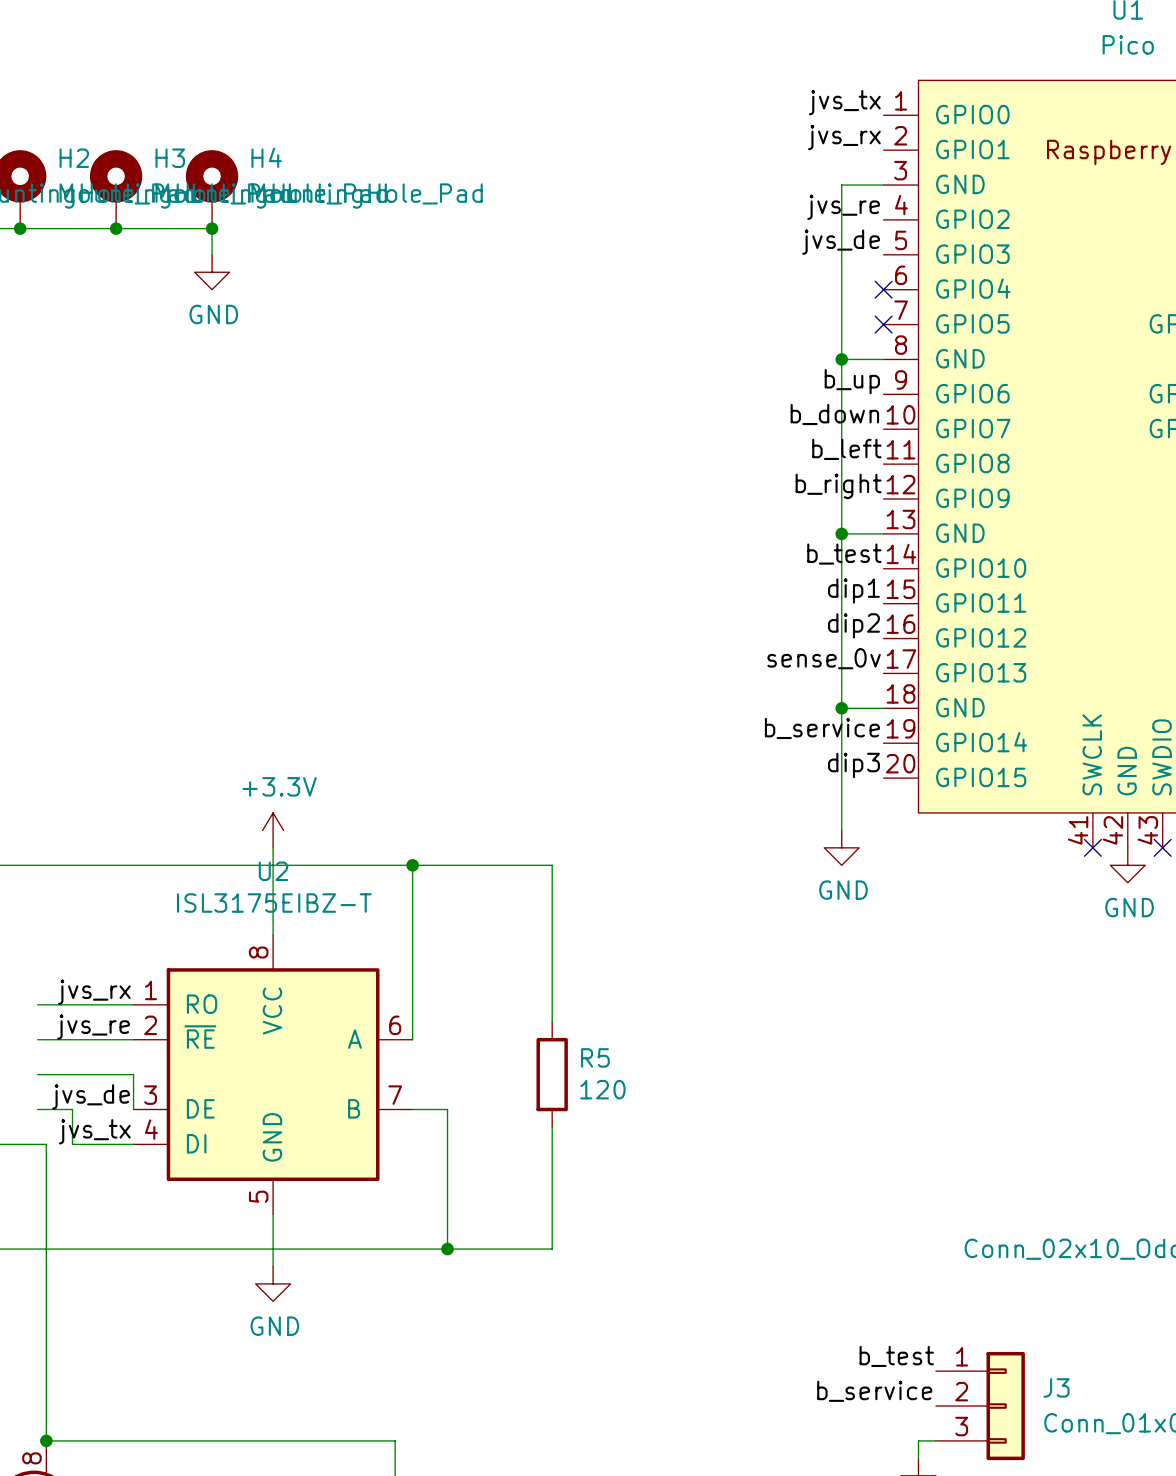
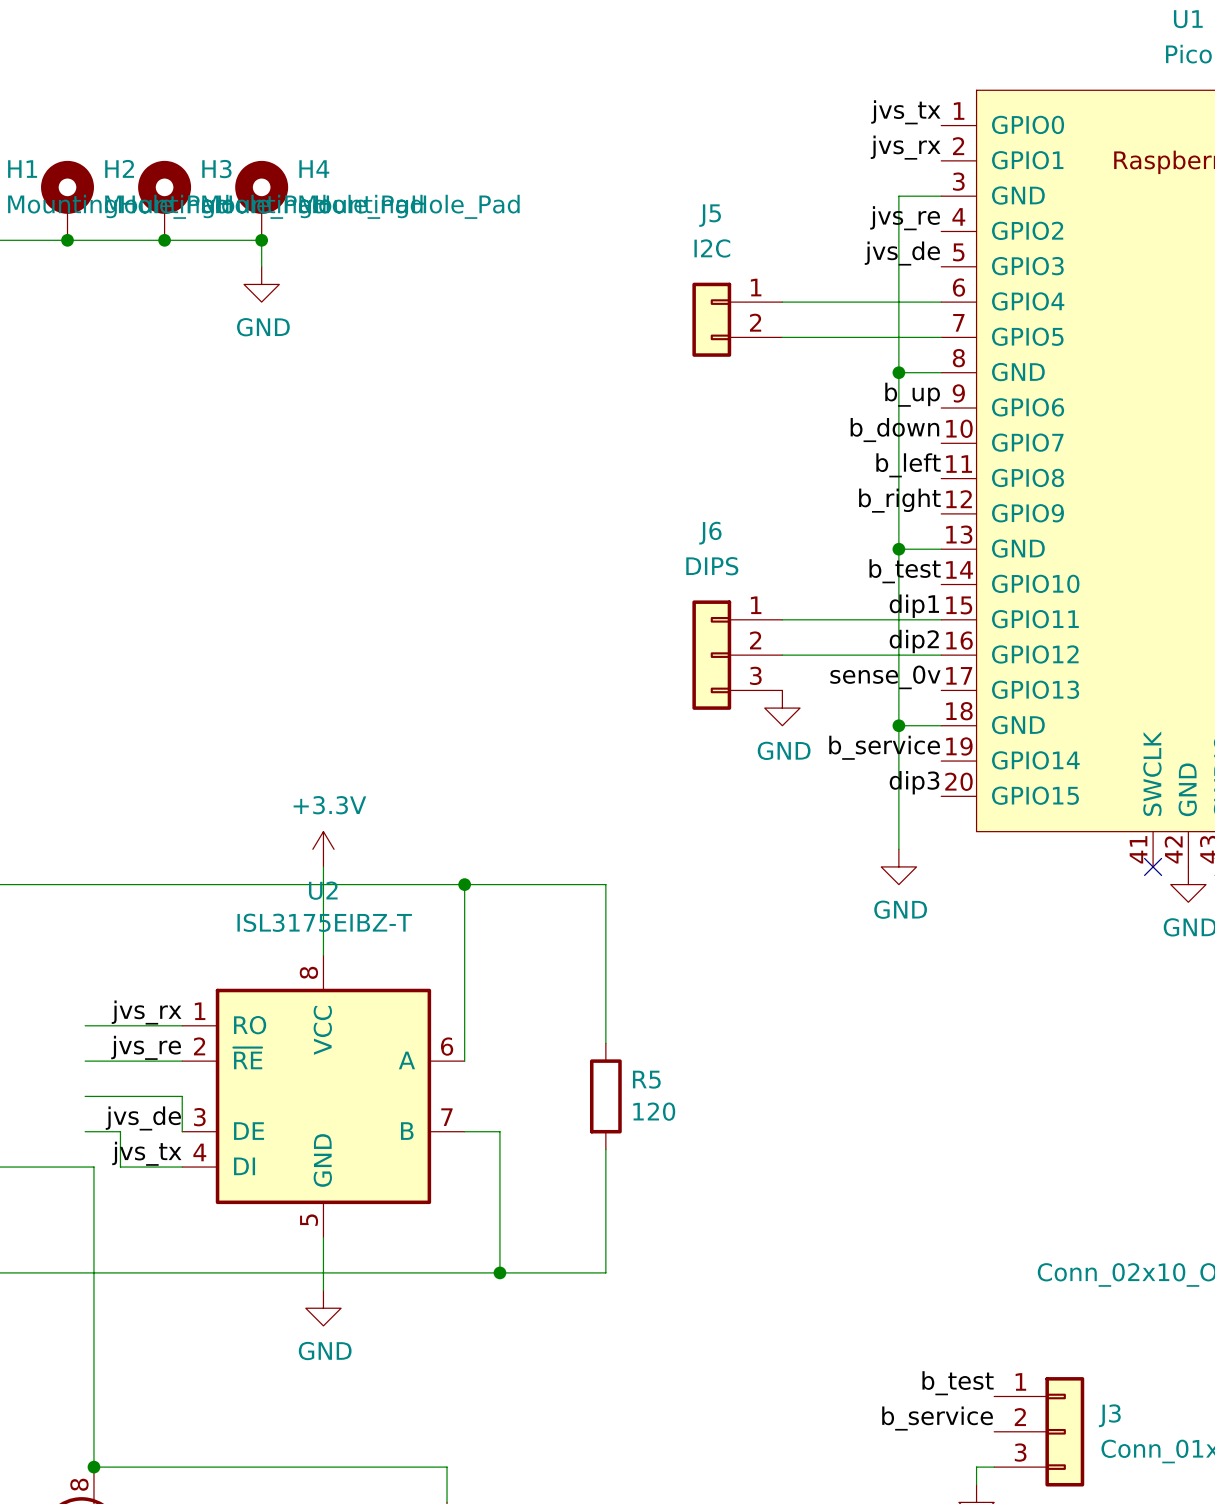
wire: none -> (782, 302) (941, 302)
no-connect mark: (883, 289) -> none
J5: none -> I2C (737, 319)
wire: none -> (782, 337) (941, 337)
no-connect mark: (883, 324) -> none
wire: none -> (782, 619) (941, 619)
J6: none -> DIPS (737, 655)
wire: none -> (782, 655) (941, 655)
power symbol: none -> GND (782, 708)

